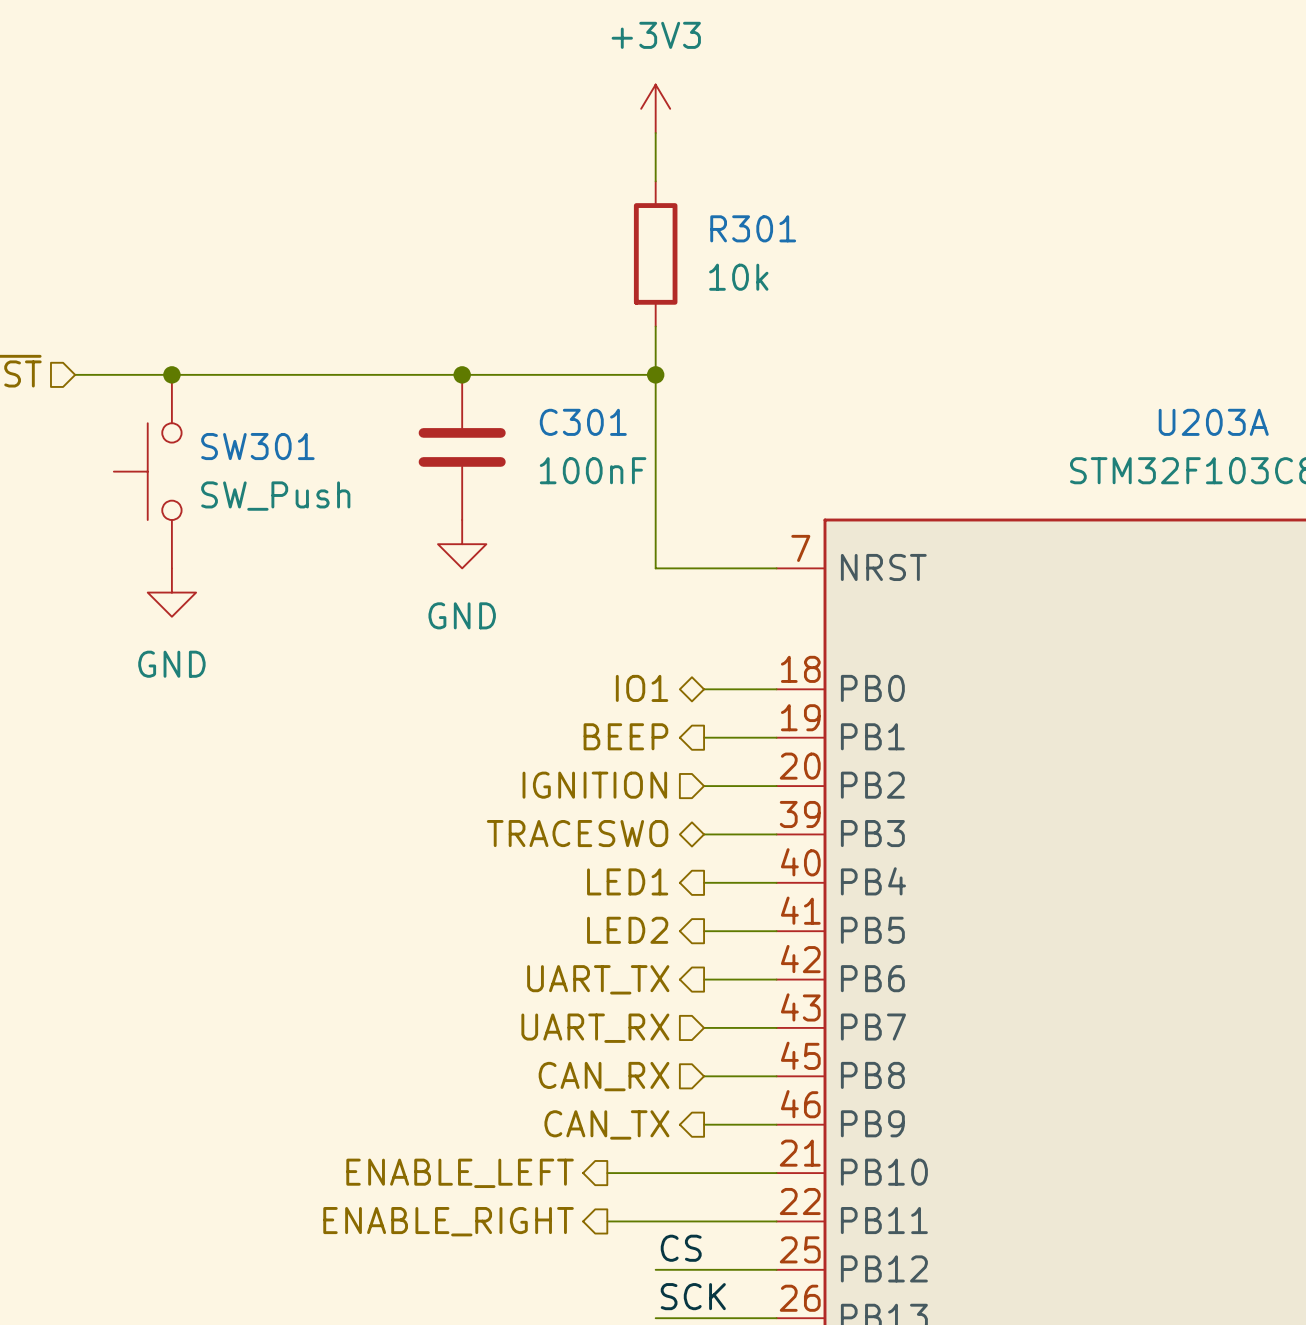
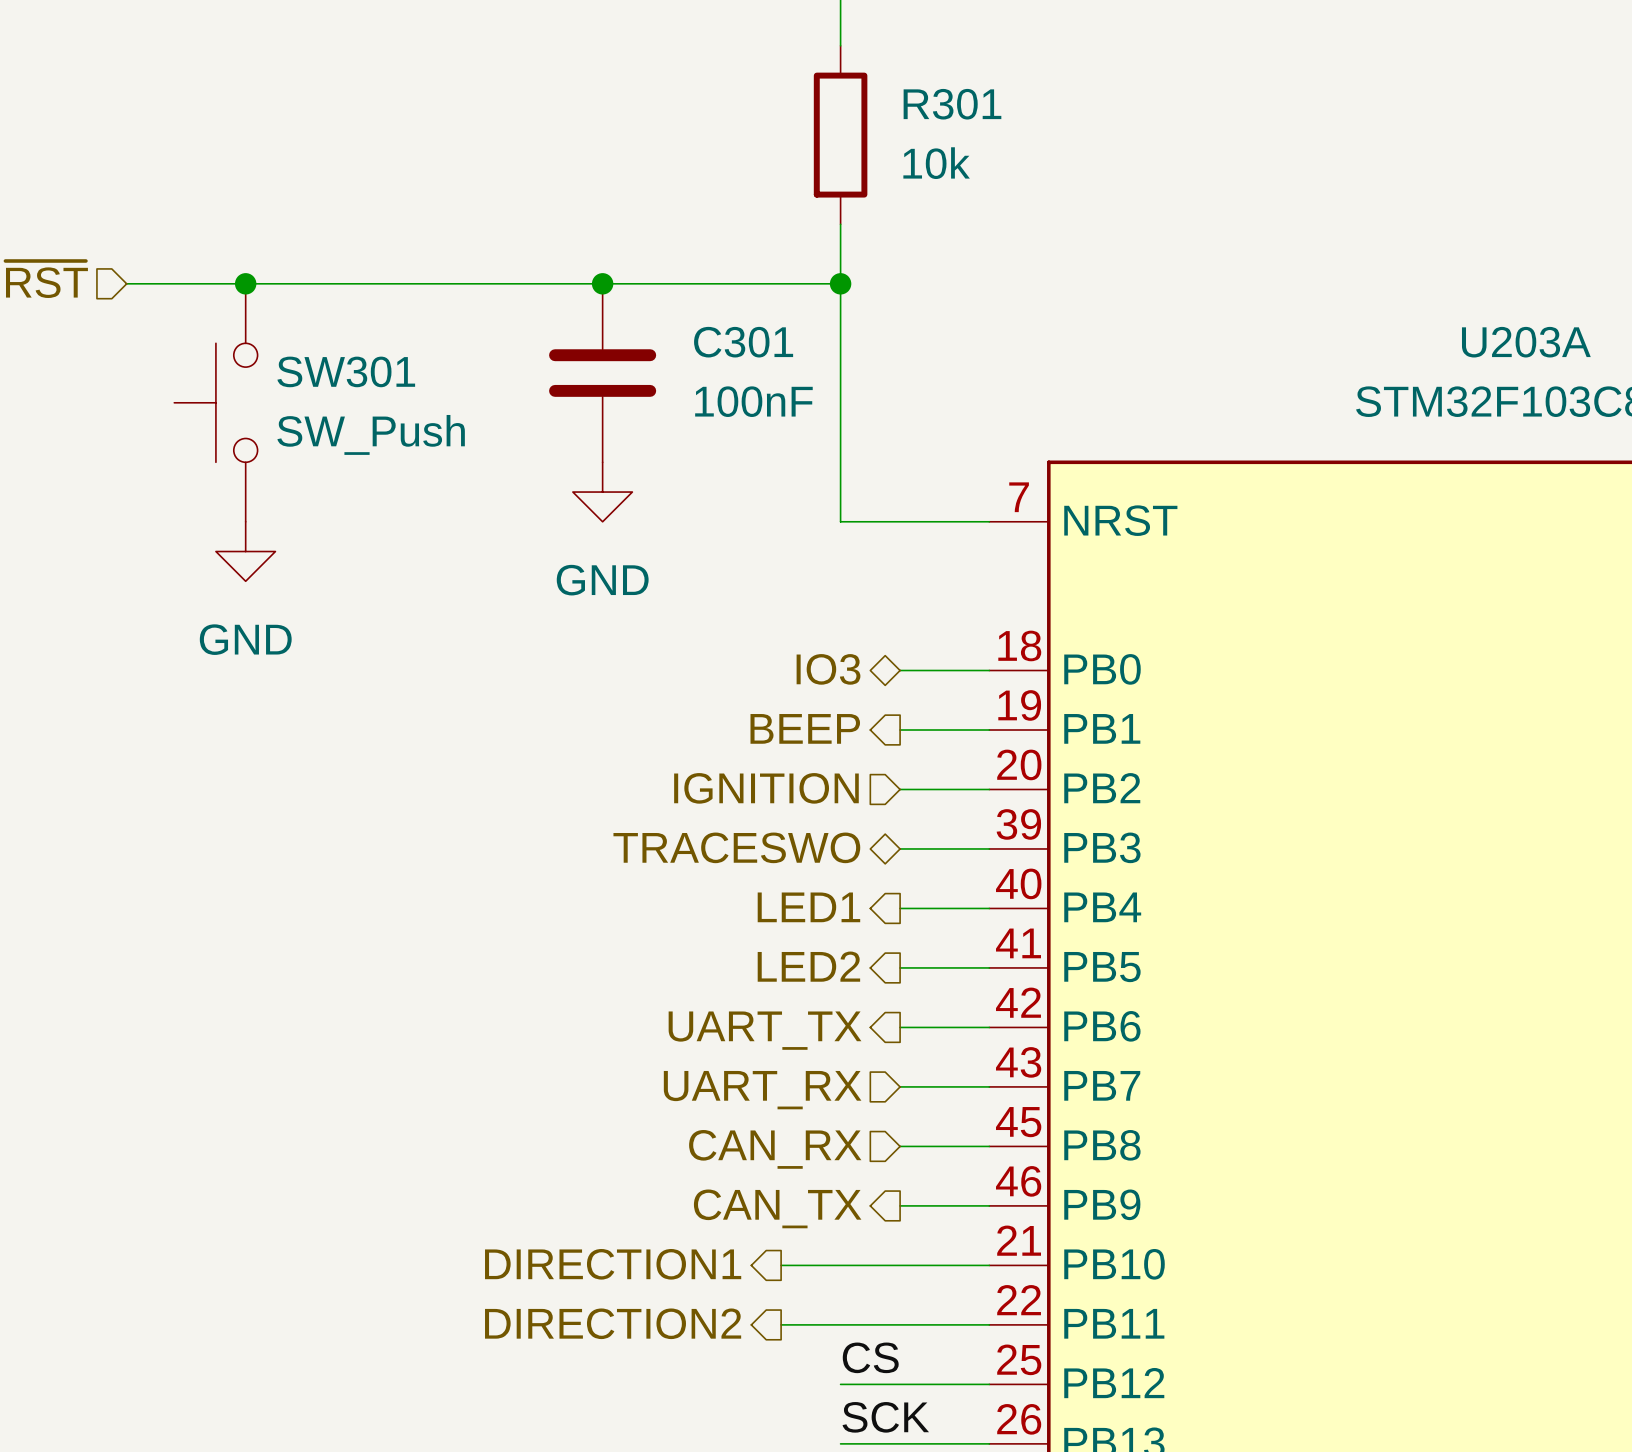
hierarchical label: IO1 (642, 688) -> IO3 (828, 669)
hierarchical label: ENABLE_LEFT (460, 1173) -> DIRECTION1 (613, 1264)
hierarchical label: ENABLE_RIGHT (448, 1221) -> DIRECTION2 (613, 1323)

